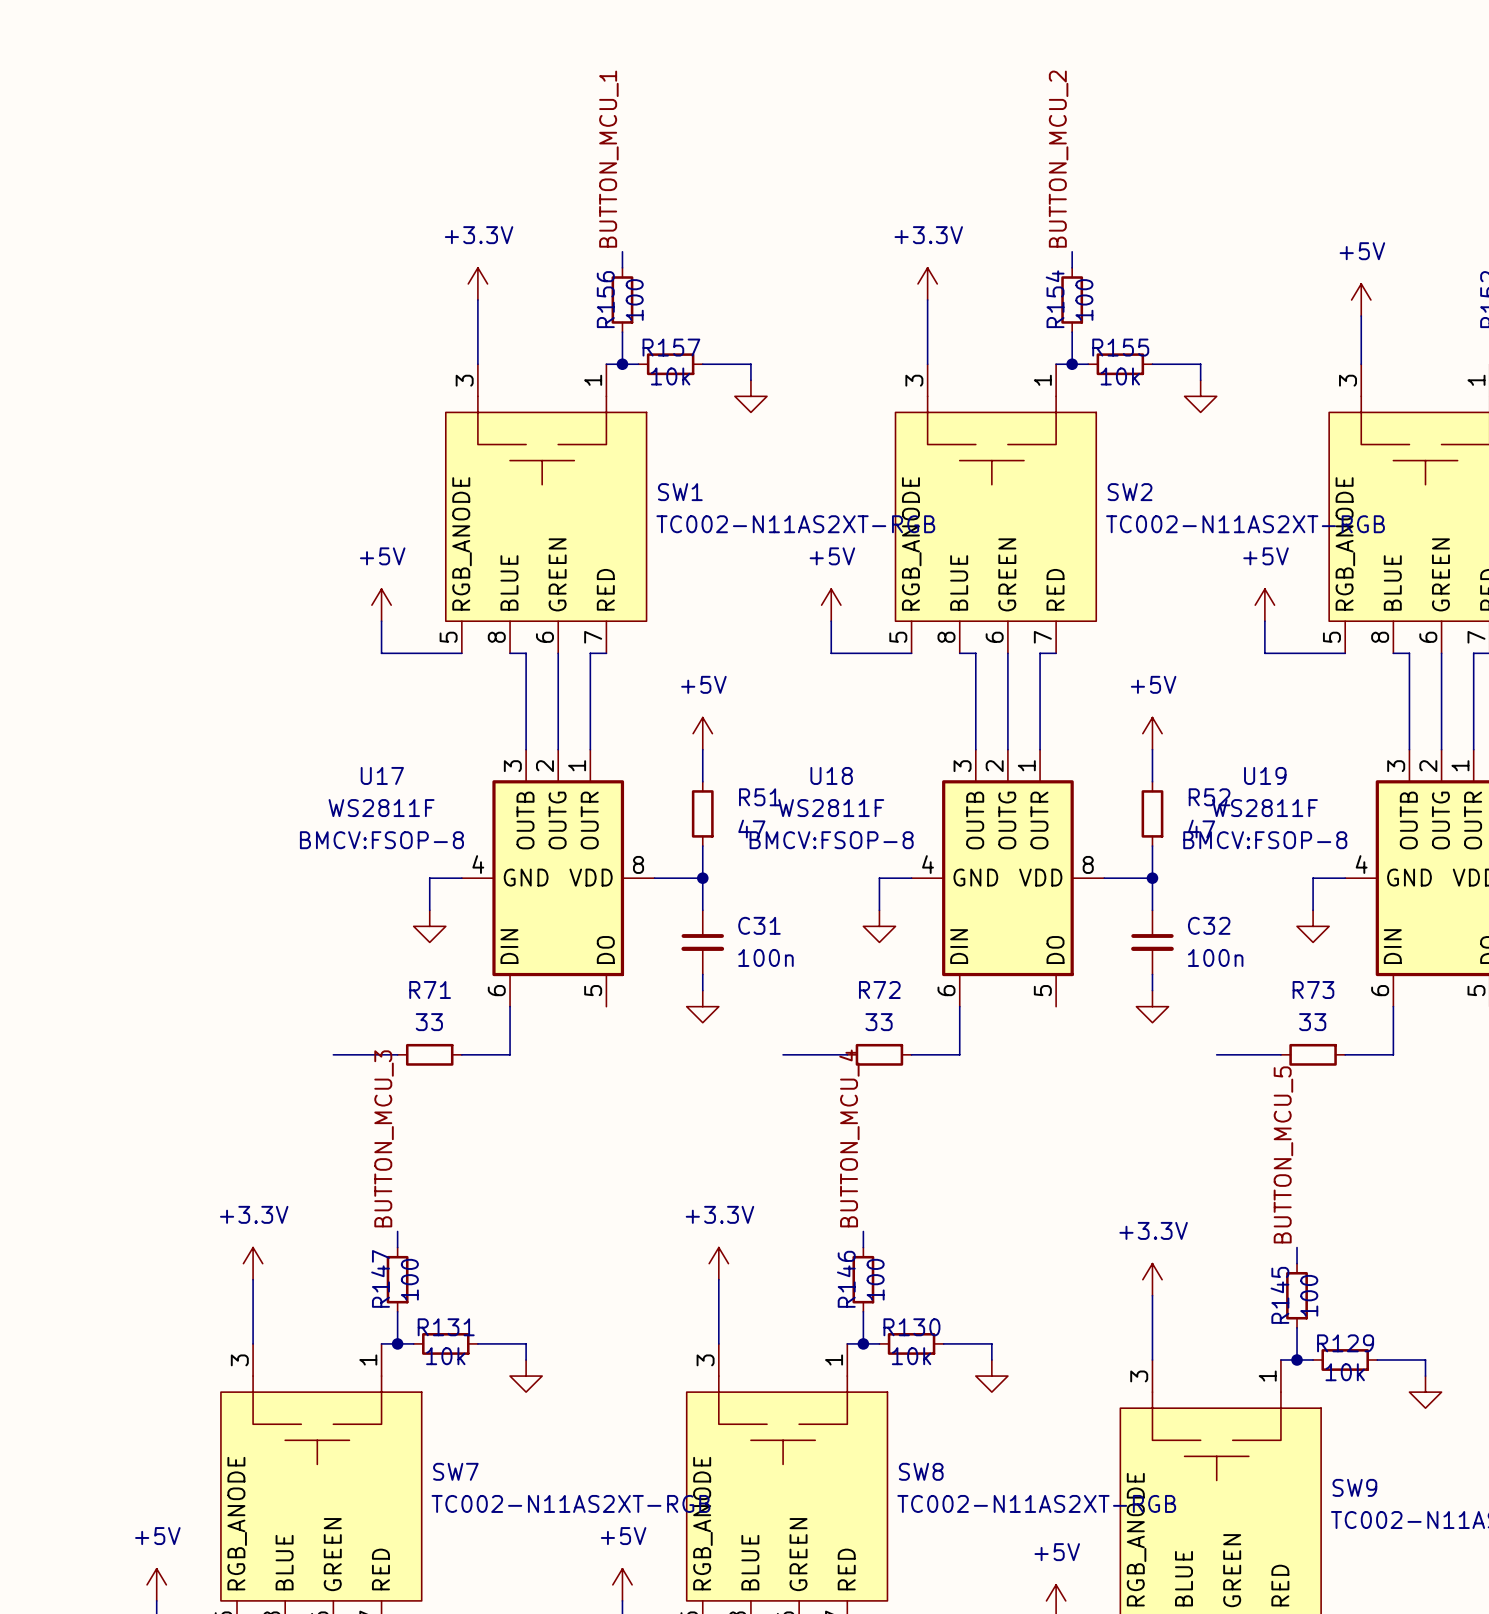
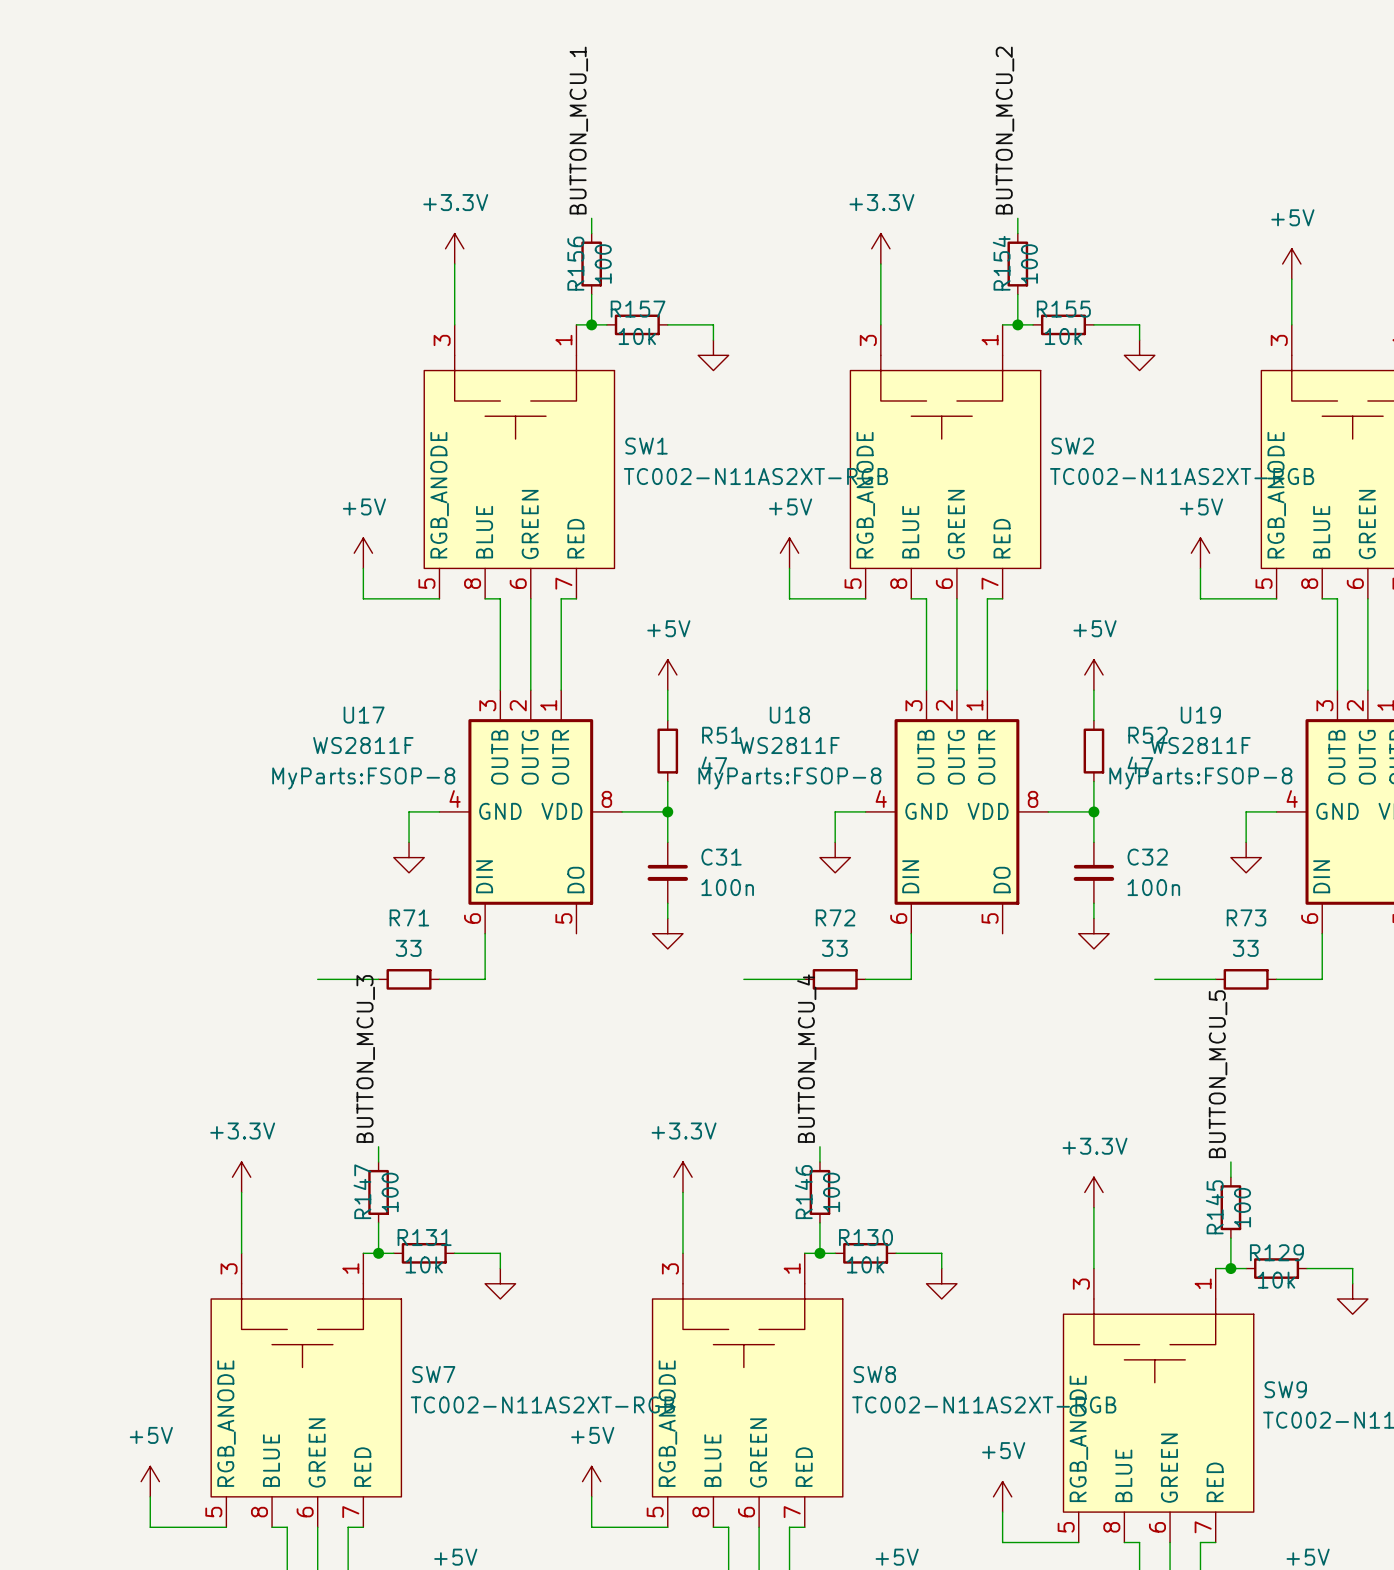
U17 text: BMCV:FSOP-8 (381, 840) -> MyParts:FSOP-8 (363, 778)
U18 text: BMCV:FSOP-8 (831, 840) -> MyParts:FSOP-8 (789, 778)
U19 text: BMCV:FSOP-8 (1265, 840) -> MyParts:FSOP-8 (1200, 778)

